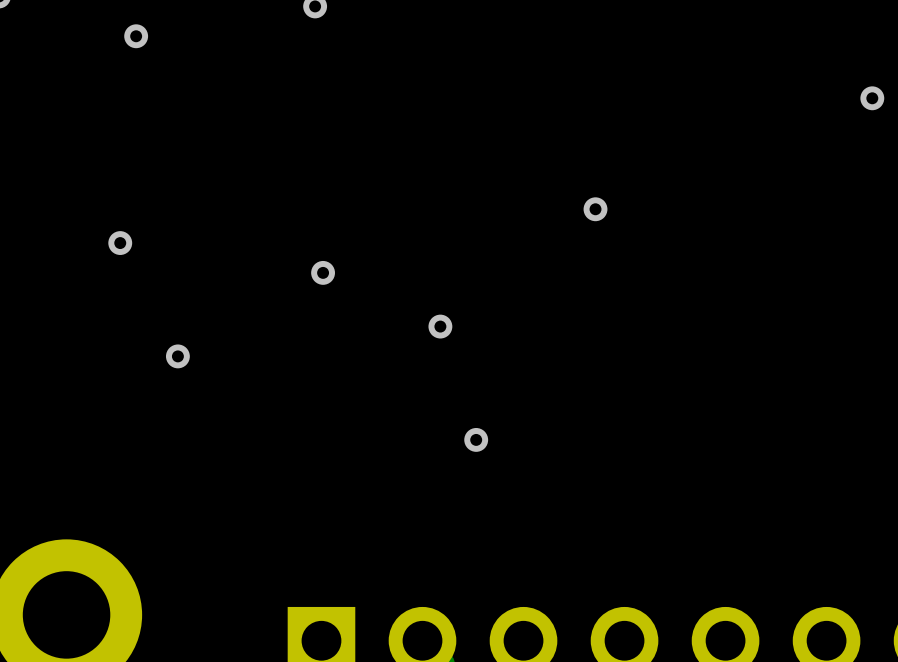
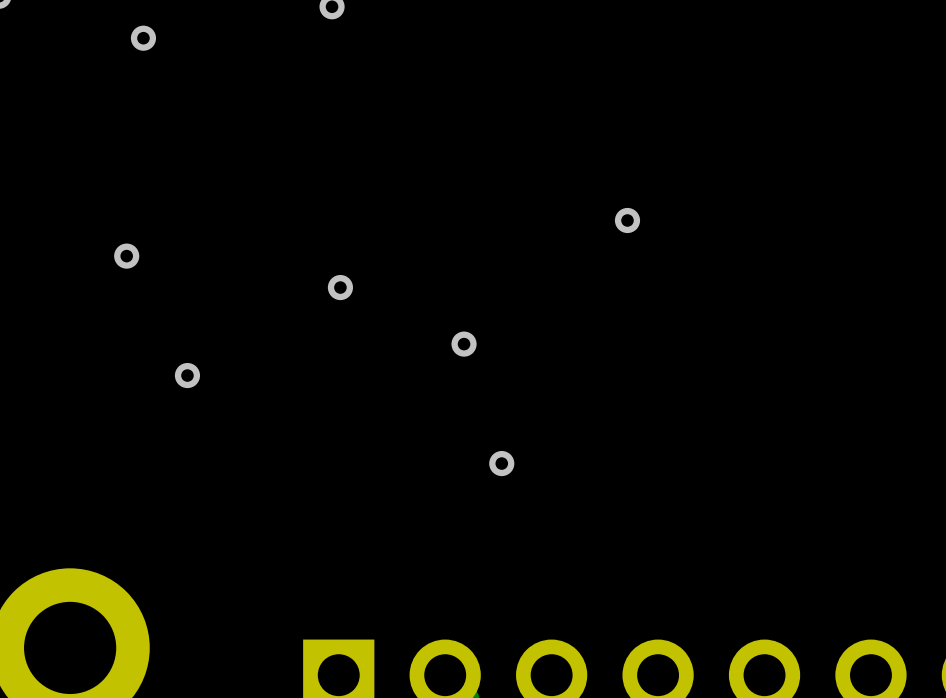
via: (872, 98) -> none

